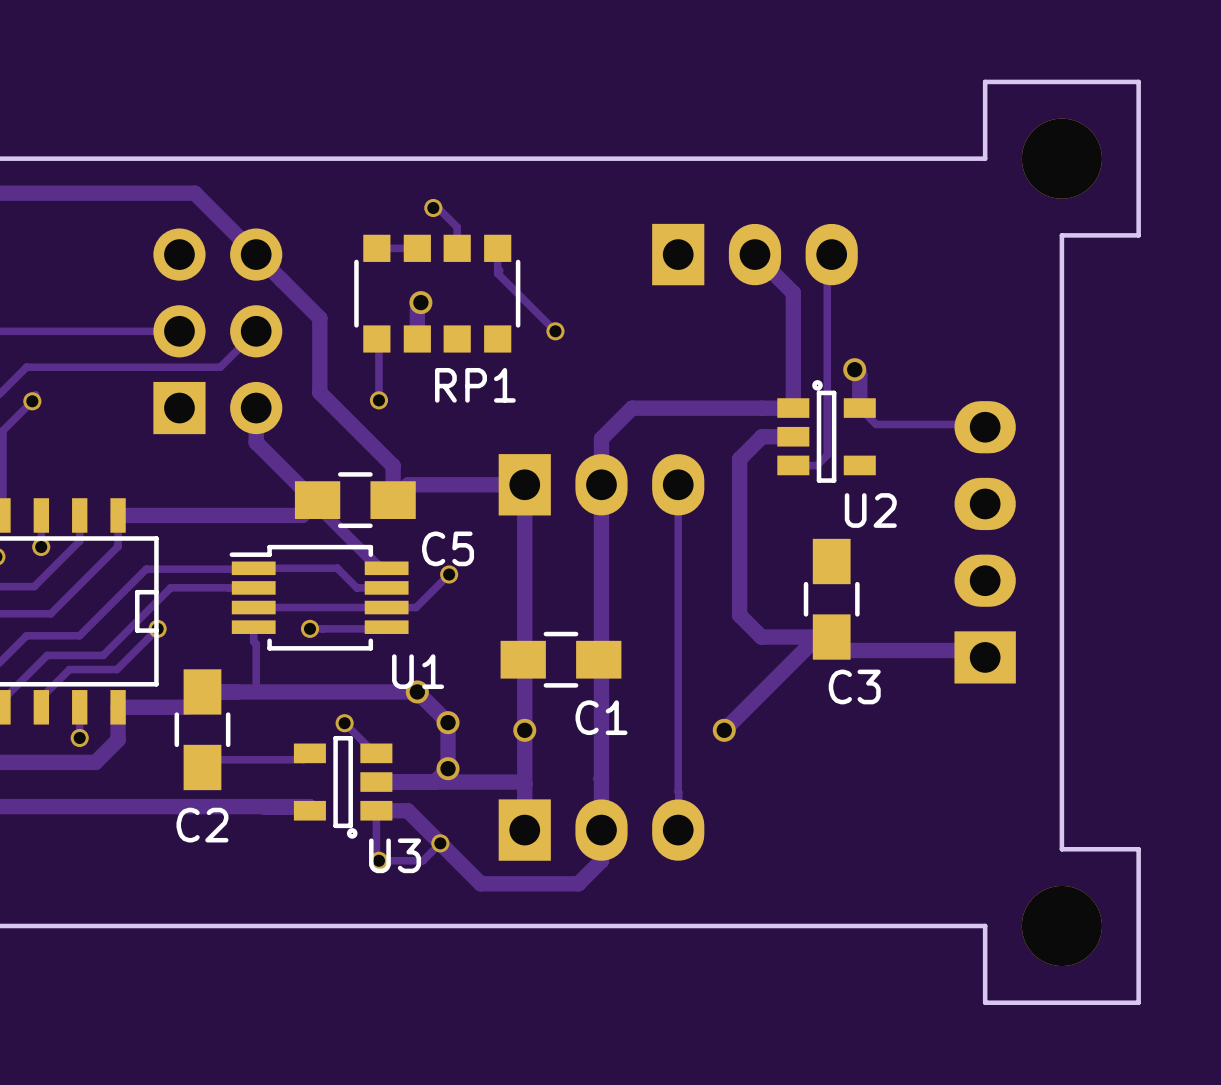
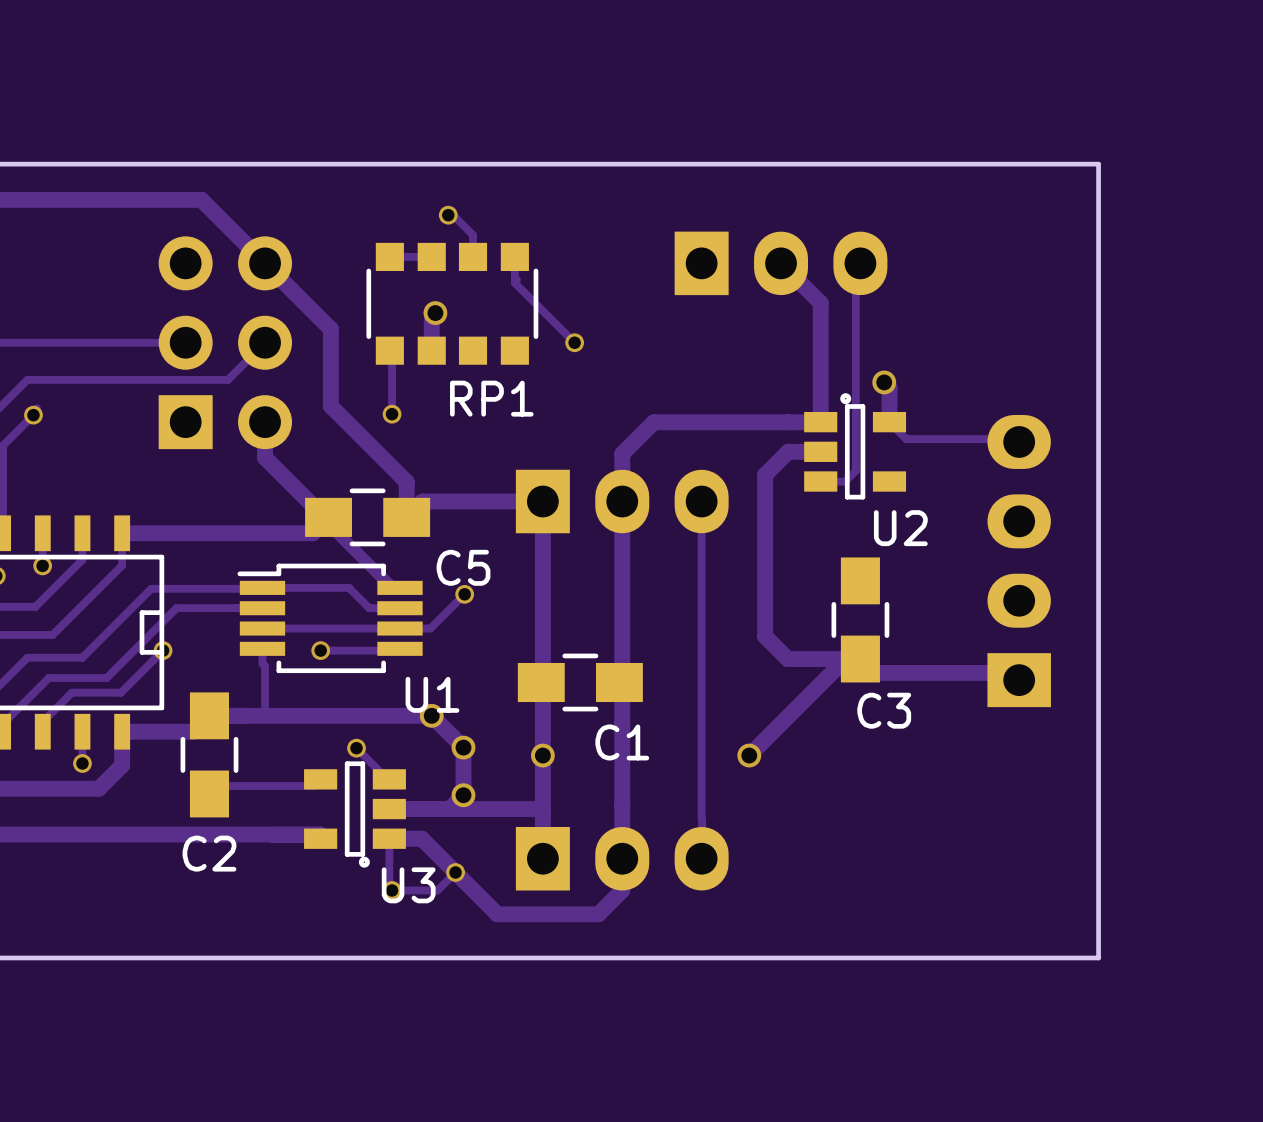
board edge: (985, 158) (985, 81) (1138, 81) (1138, 235) (1061, 235) -> (1019, 164) (1098, 164) (1098, 243)
part: (1061, 158) -> none
board edge: (1061, 849) (1138, 849) (1138, 1002) (985, 1002) (985, 925) -> (1098, 878) (1098, 957) (1019, 957)
part: (1061, 925) -> none

